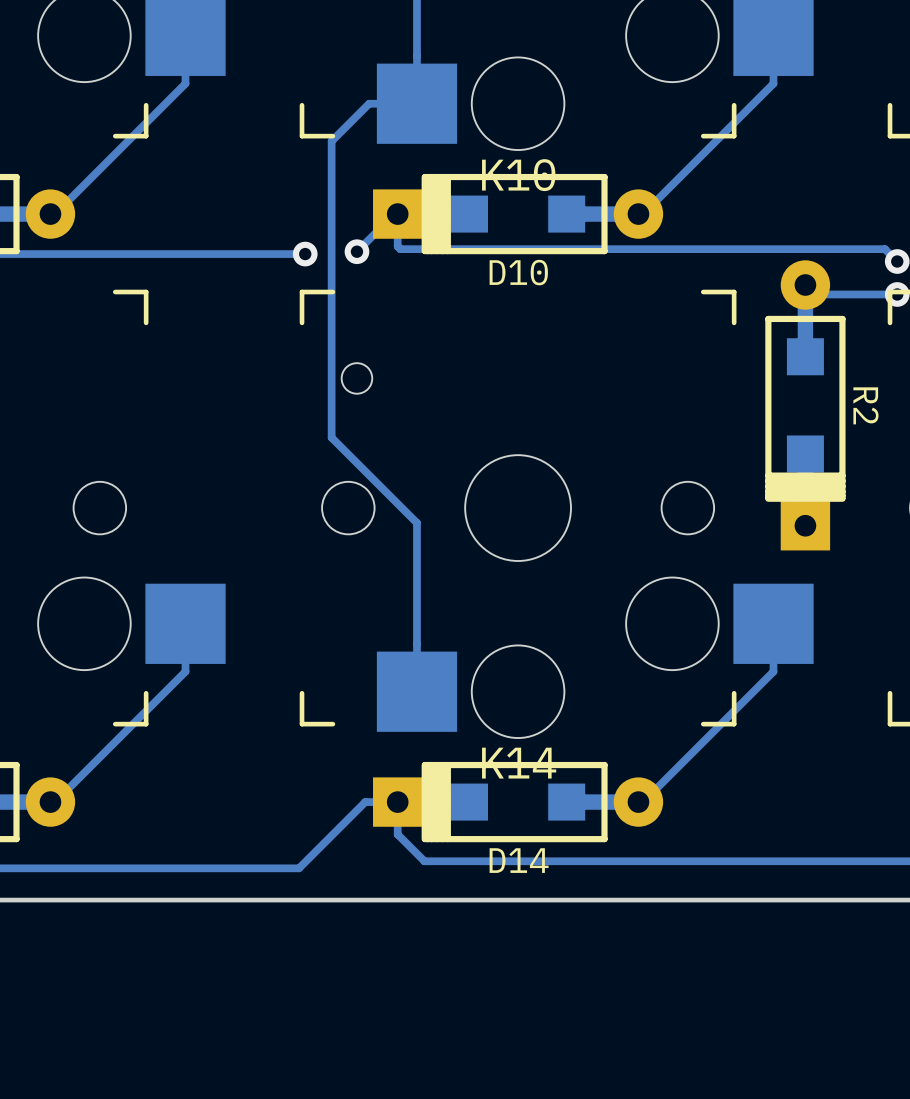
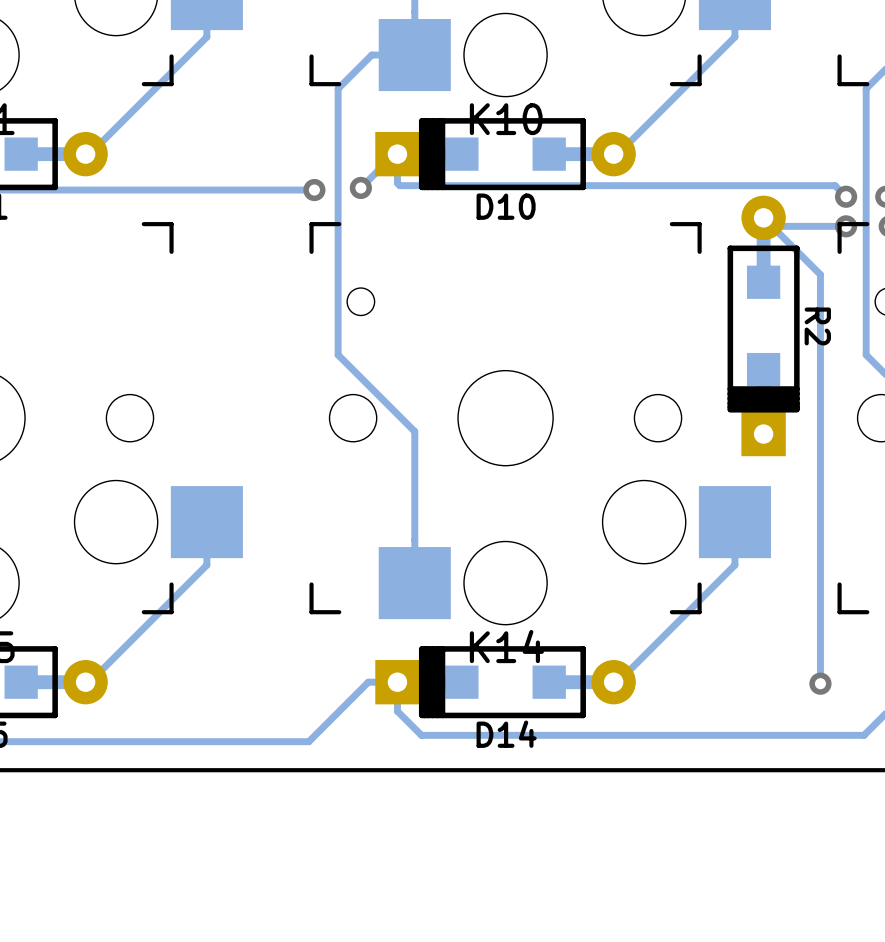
track: none -> (772, 226) (820, 274) (820, 683)
via: none -> (820, 683)

